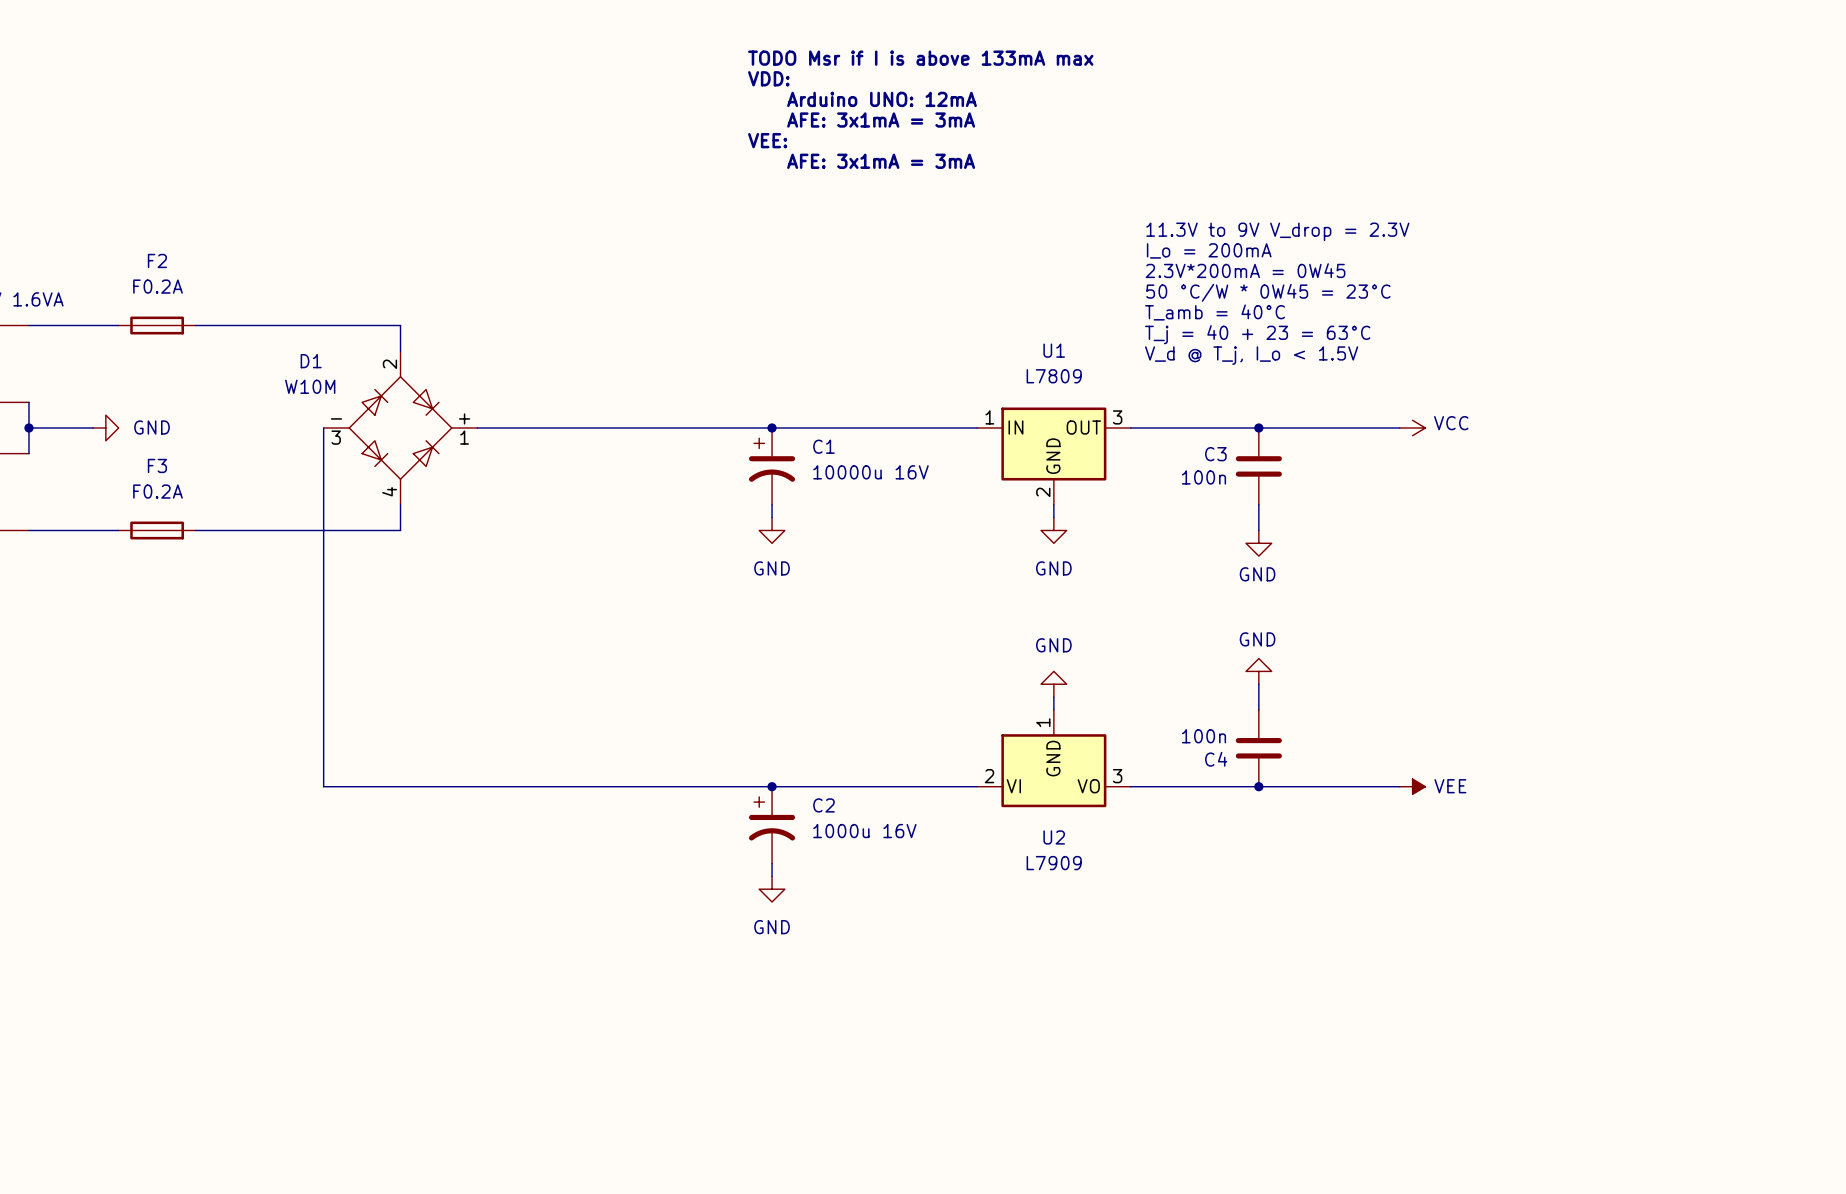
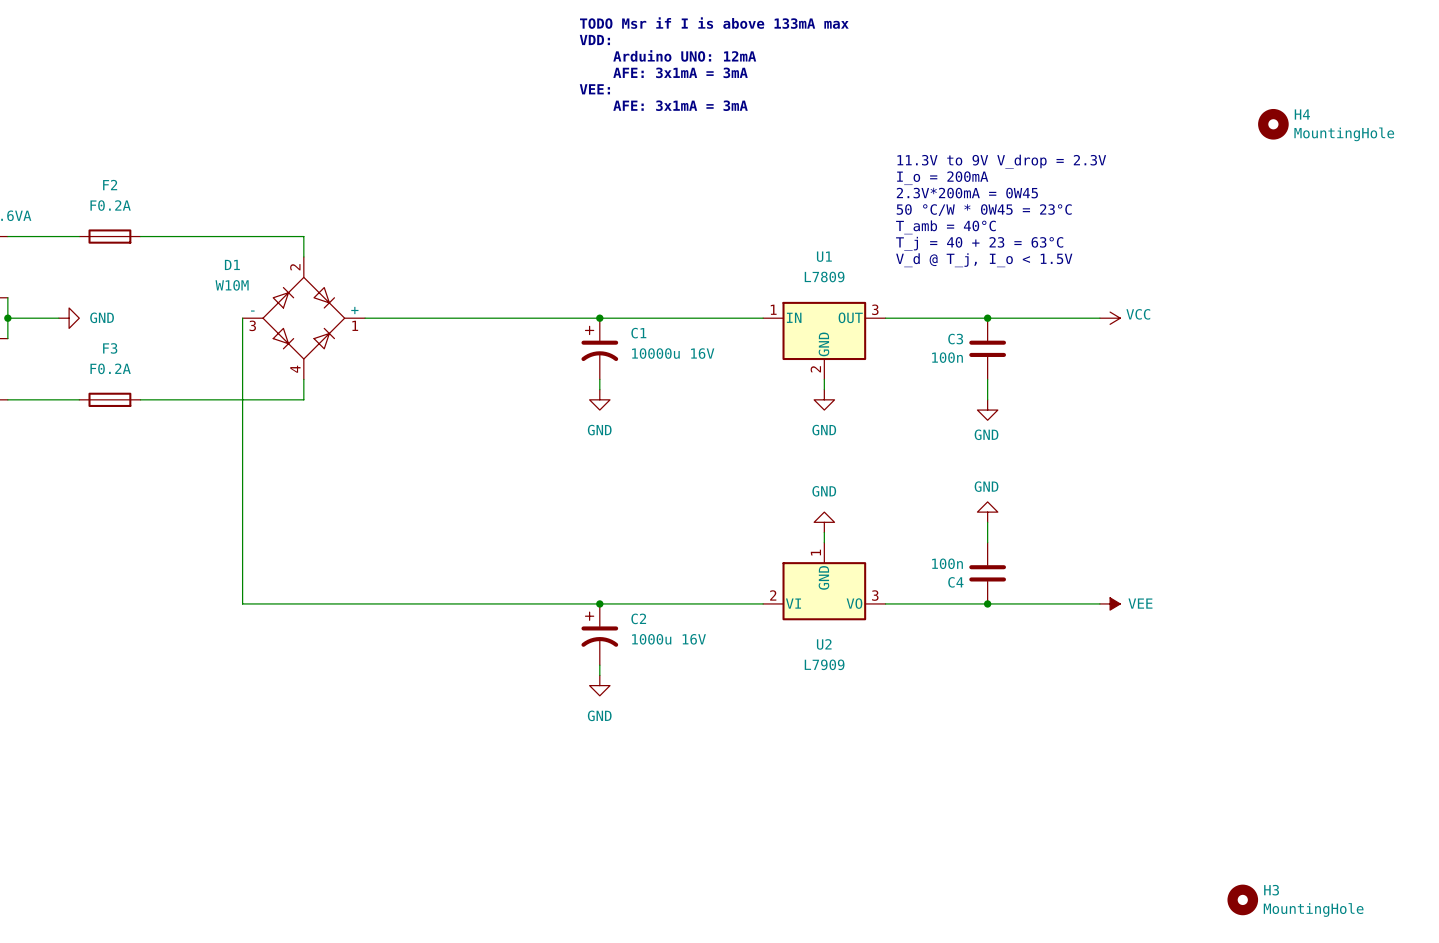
H4: none -> MountingHole (1273, 124)
H3: none -> MountingHole (1242, 899)

